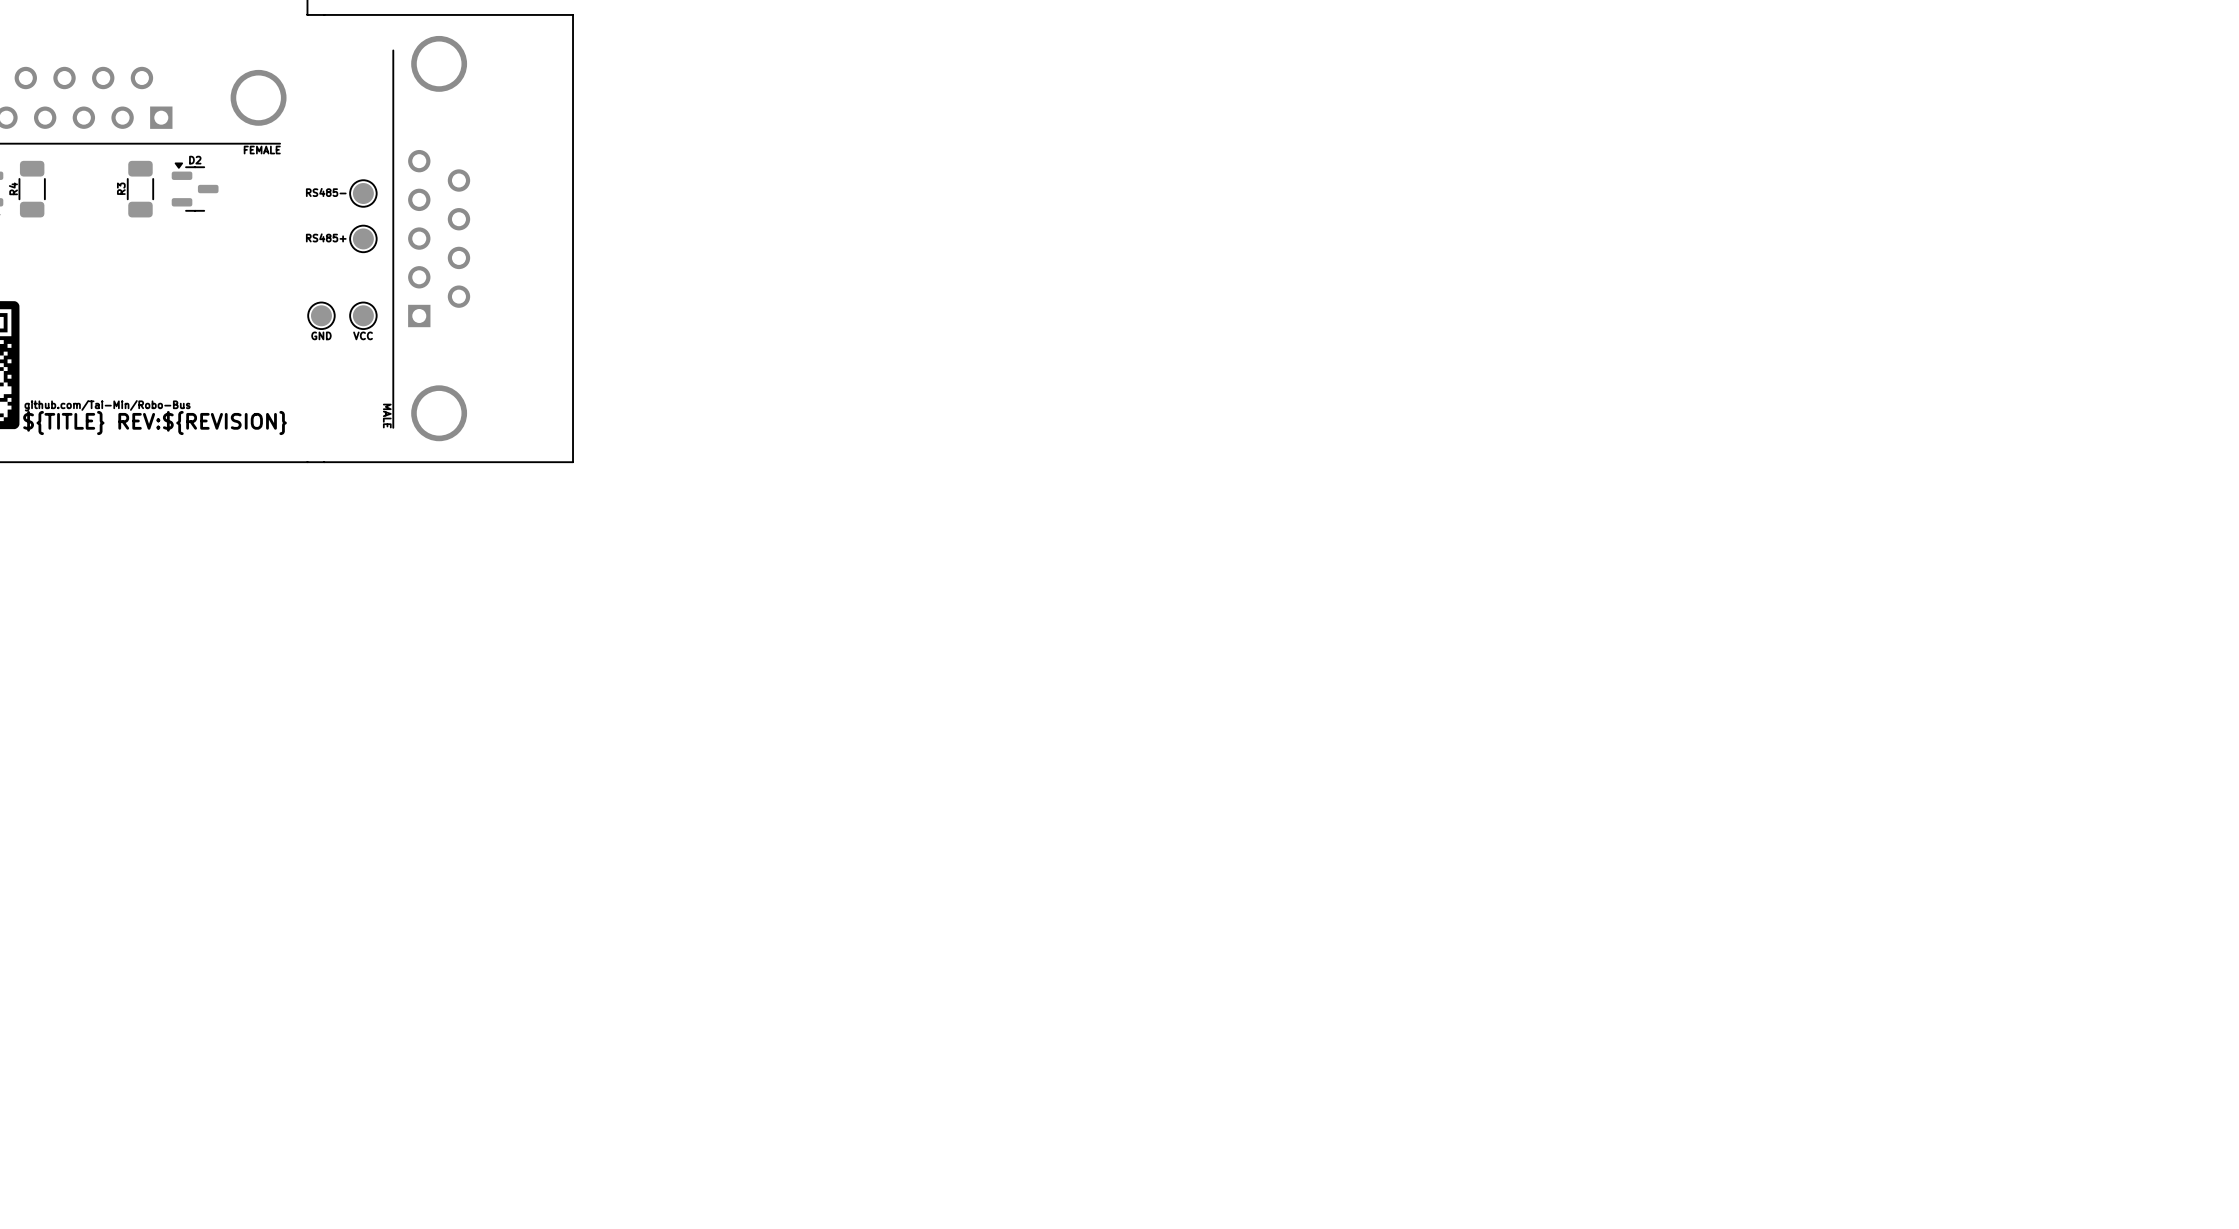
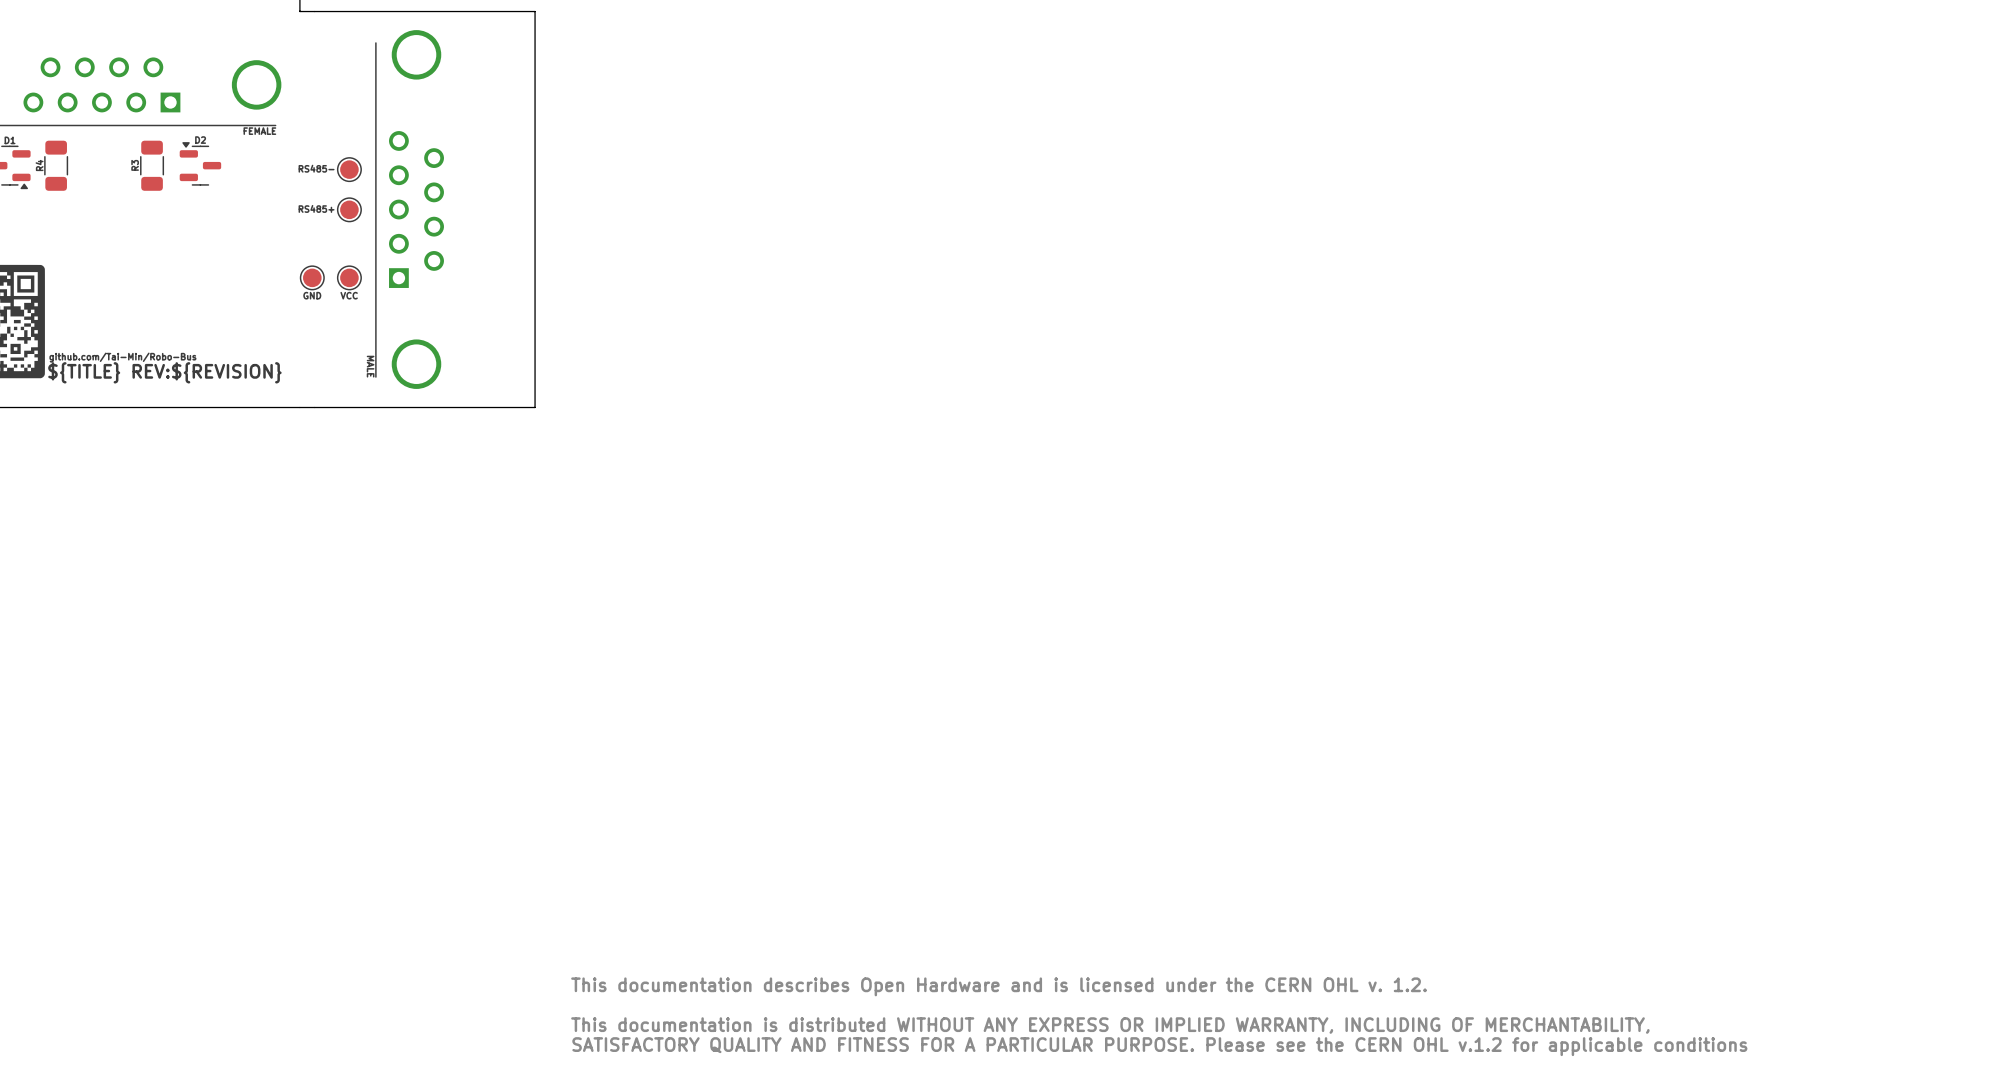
text: none -> This documentation describes Open Hardware and is licensed under the CERN OHL v. 1.2. (998, 986)
text: none -> This documentation is distributed WITHOUT ANY EXPRESS OR IMPLIED WARRANTY, INCLUDING OF MERCHANTABILITY, (1110, 1025)
text: none -> SATISFACTORY QUALITY AND FITNESS FOR A PARTICULAR PURPOSE. Please see the CERN OHL v.1.2 for applicable conditions (1159, 1046)

